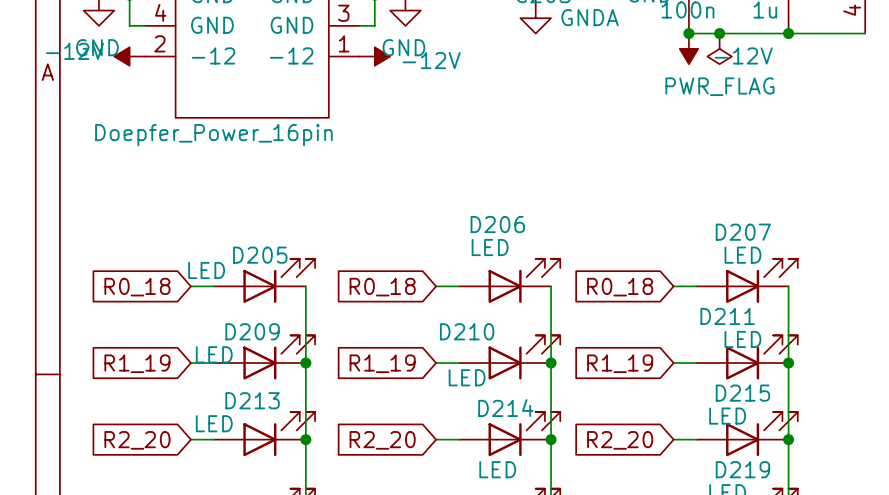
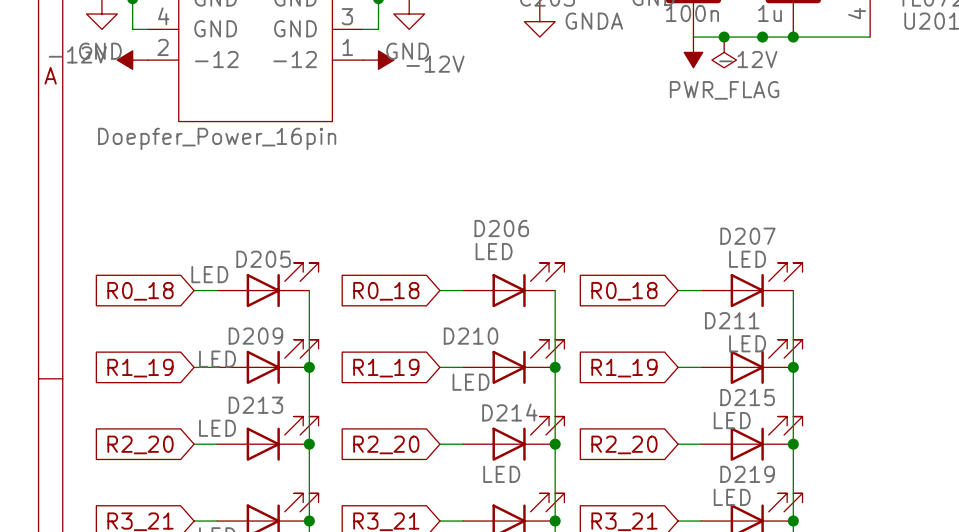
junction position: (688, 33) -> (762, 37)

